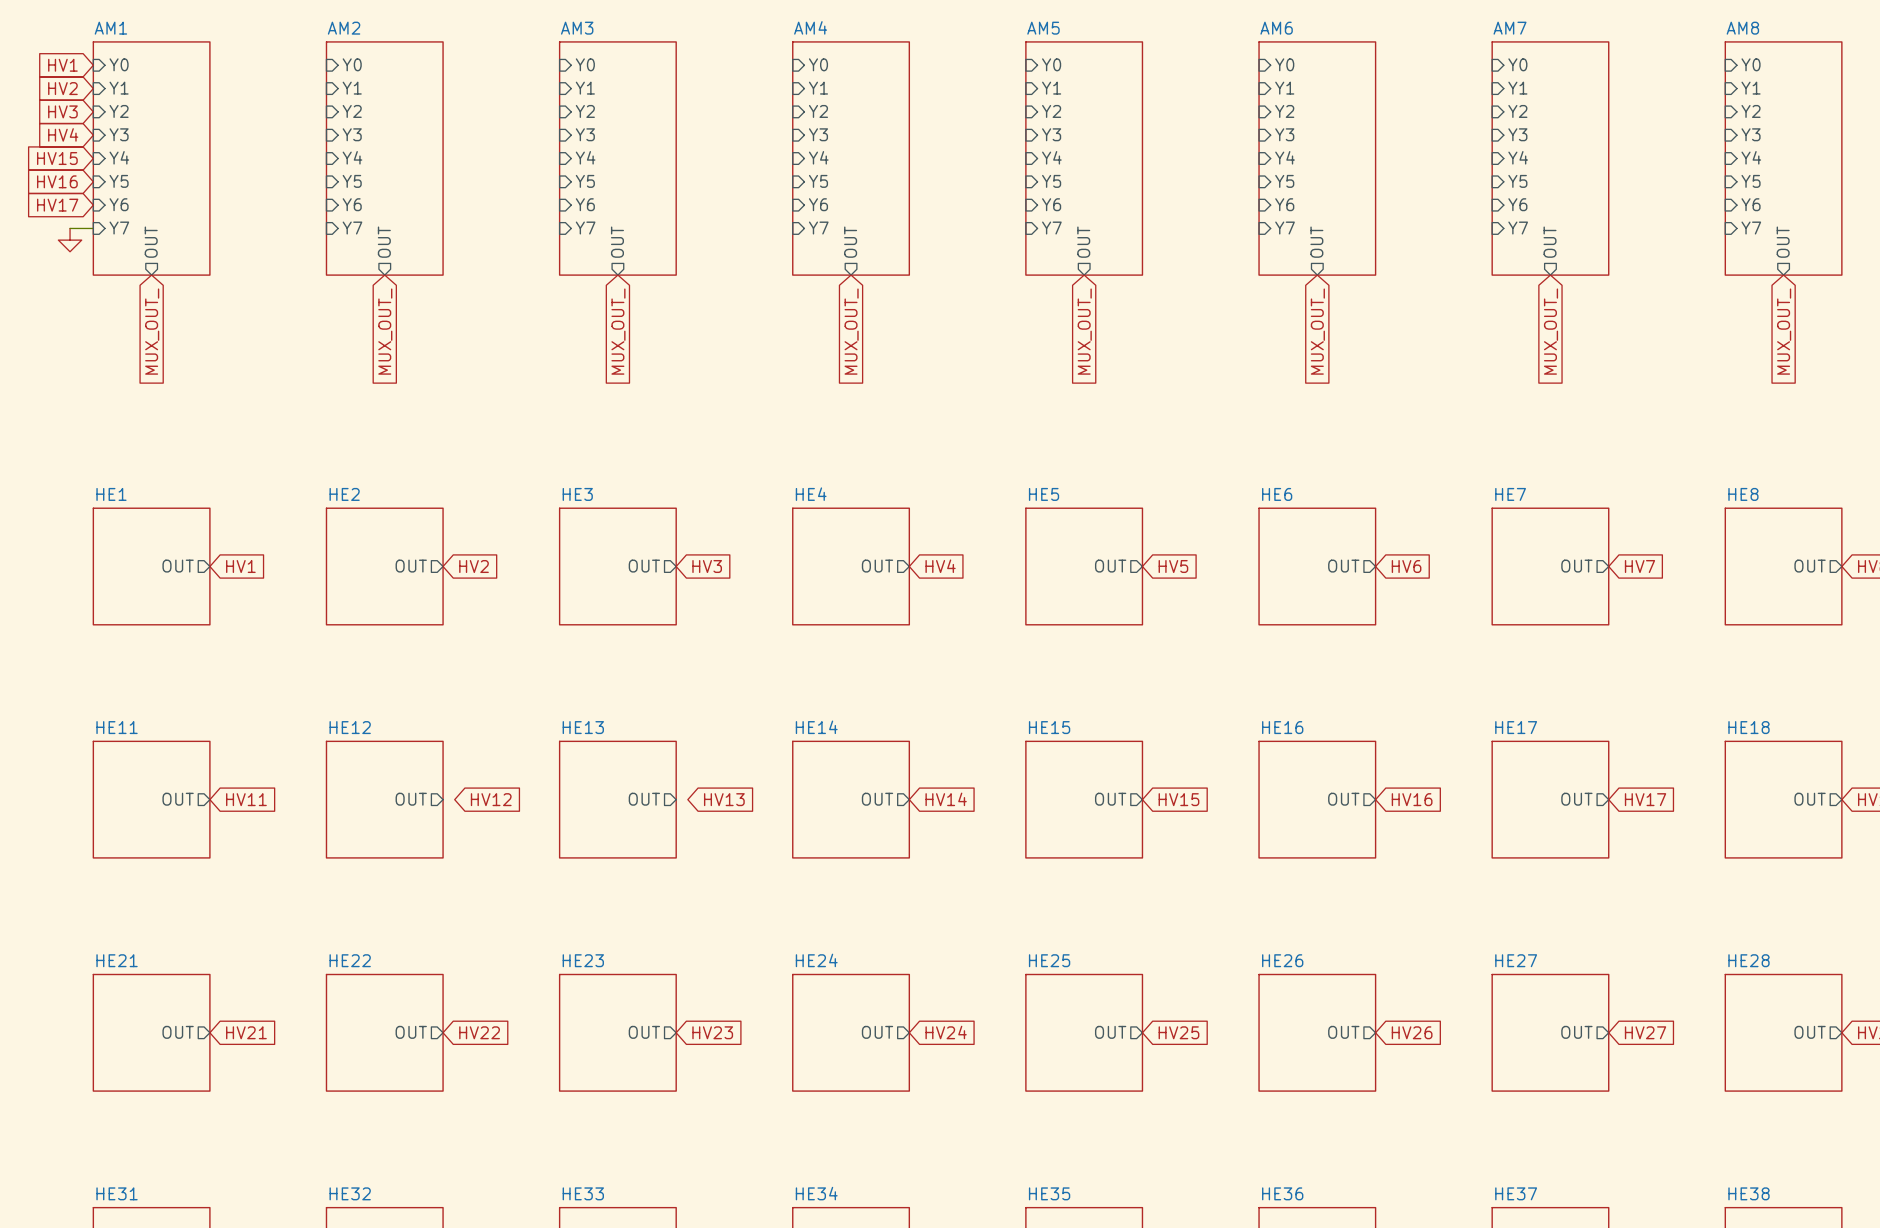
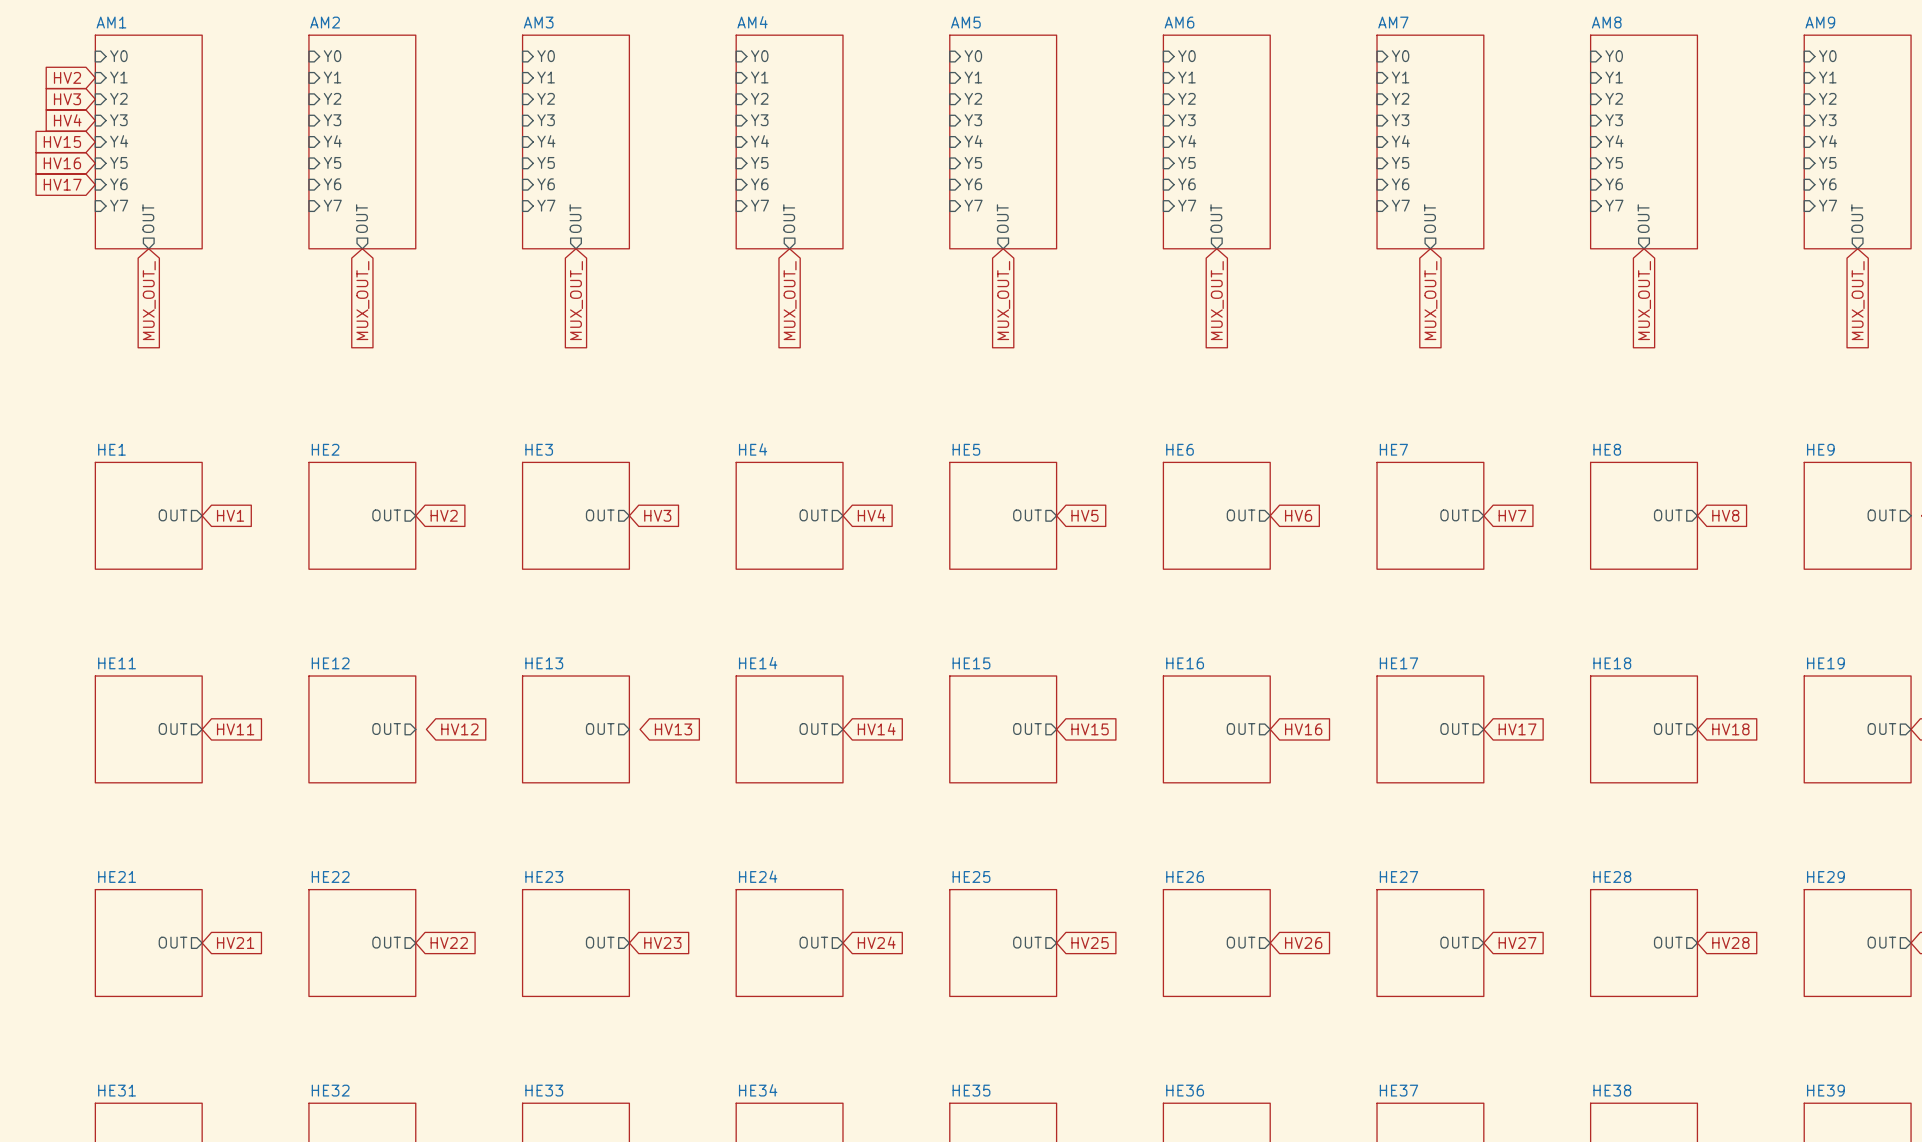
global label: HV1 (62, 65) -> none
wire: (70, 228) (93, 228) -> none
power symbol: (70, 240) -> none

